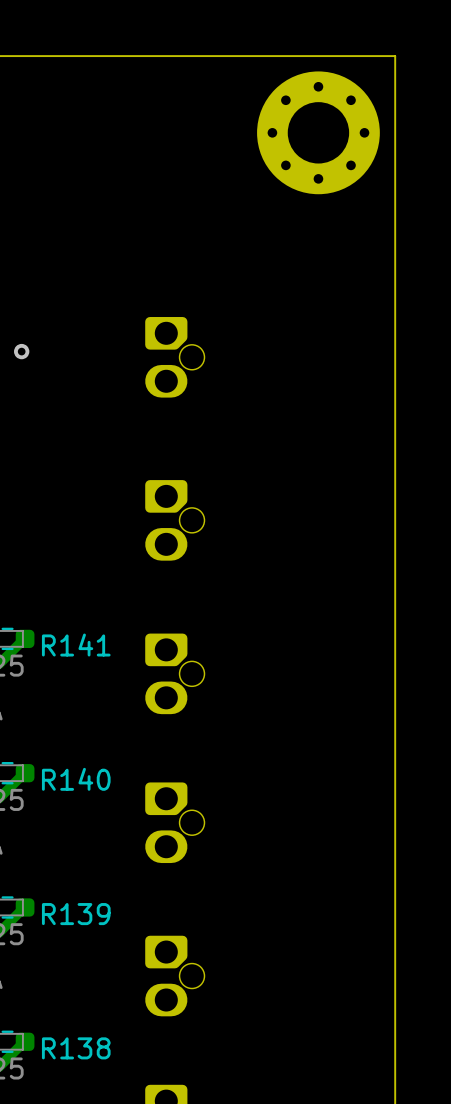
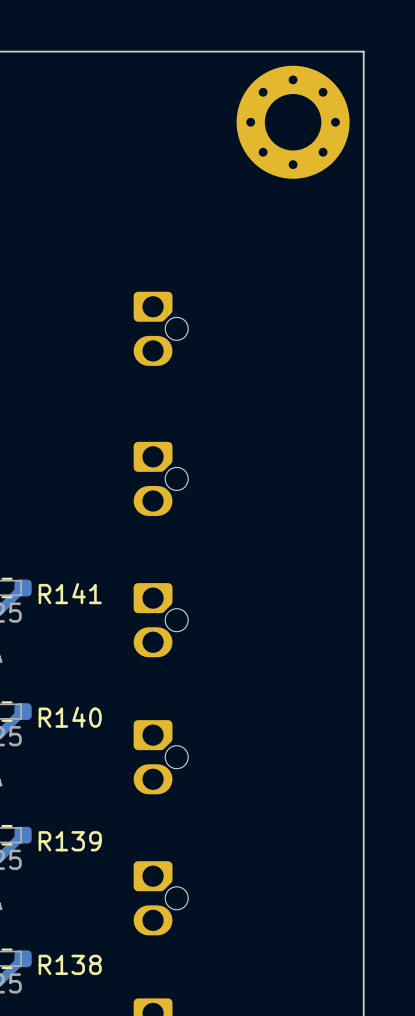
via: (21, 351) -> none

